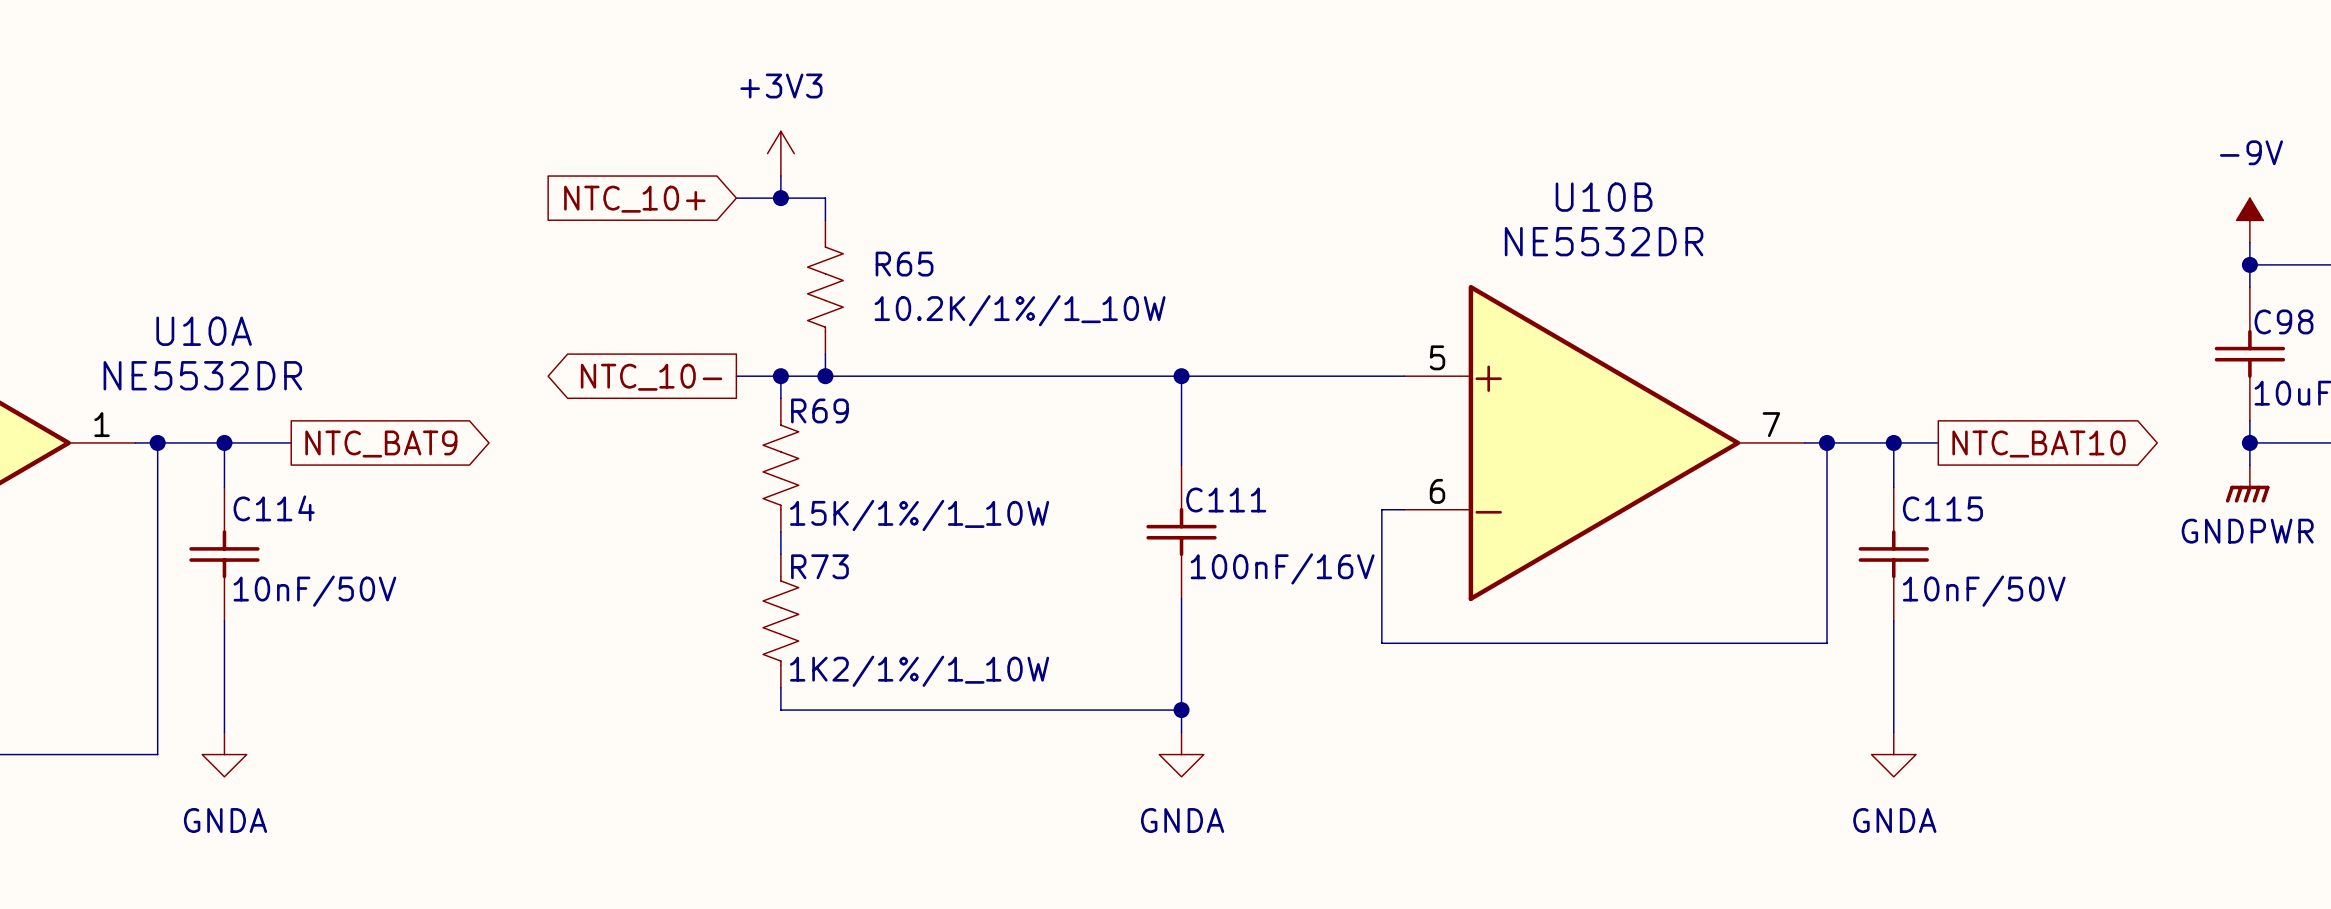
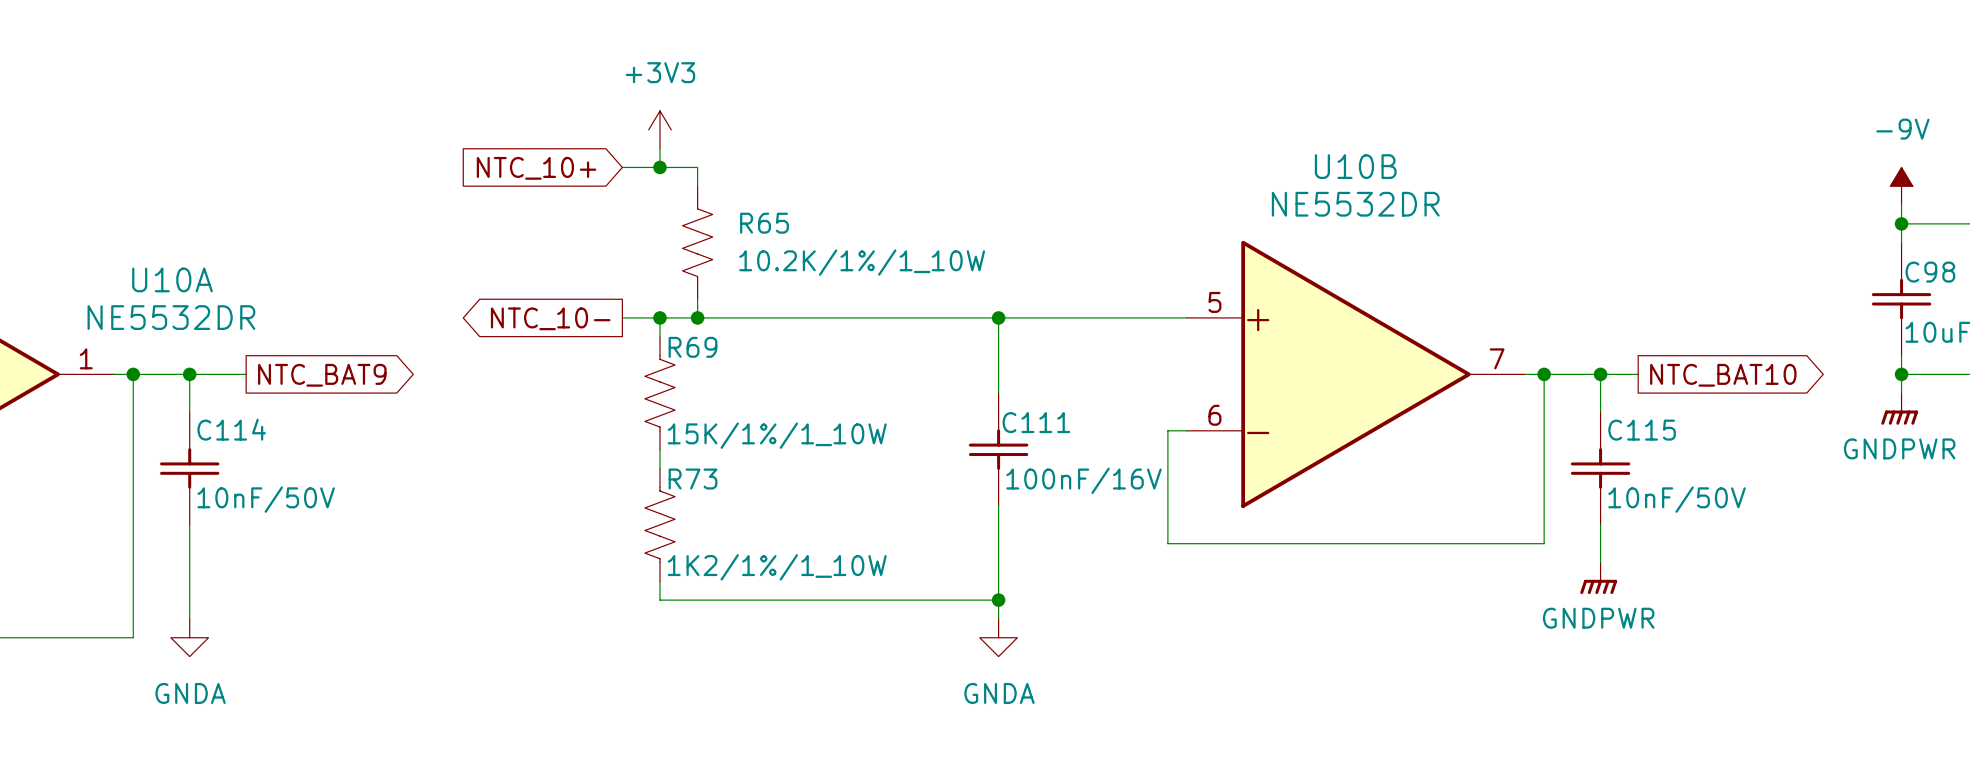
wire: (1893, 665) (1893, 732) -> none
power symbol: none -> GNDPWR (1598, 578)
power symbol: GNDA (1893, 754) -> none

